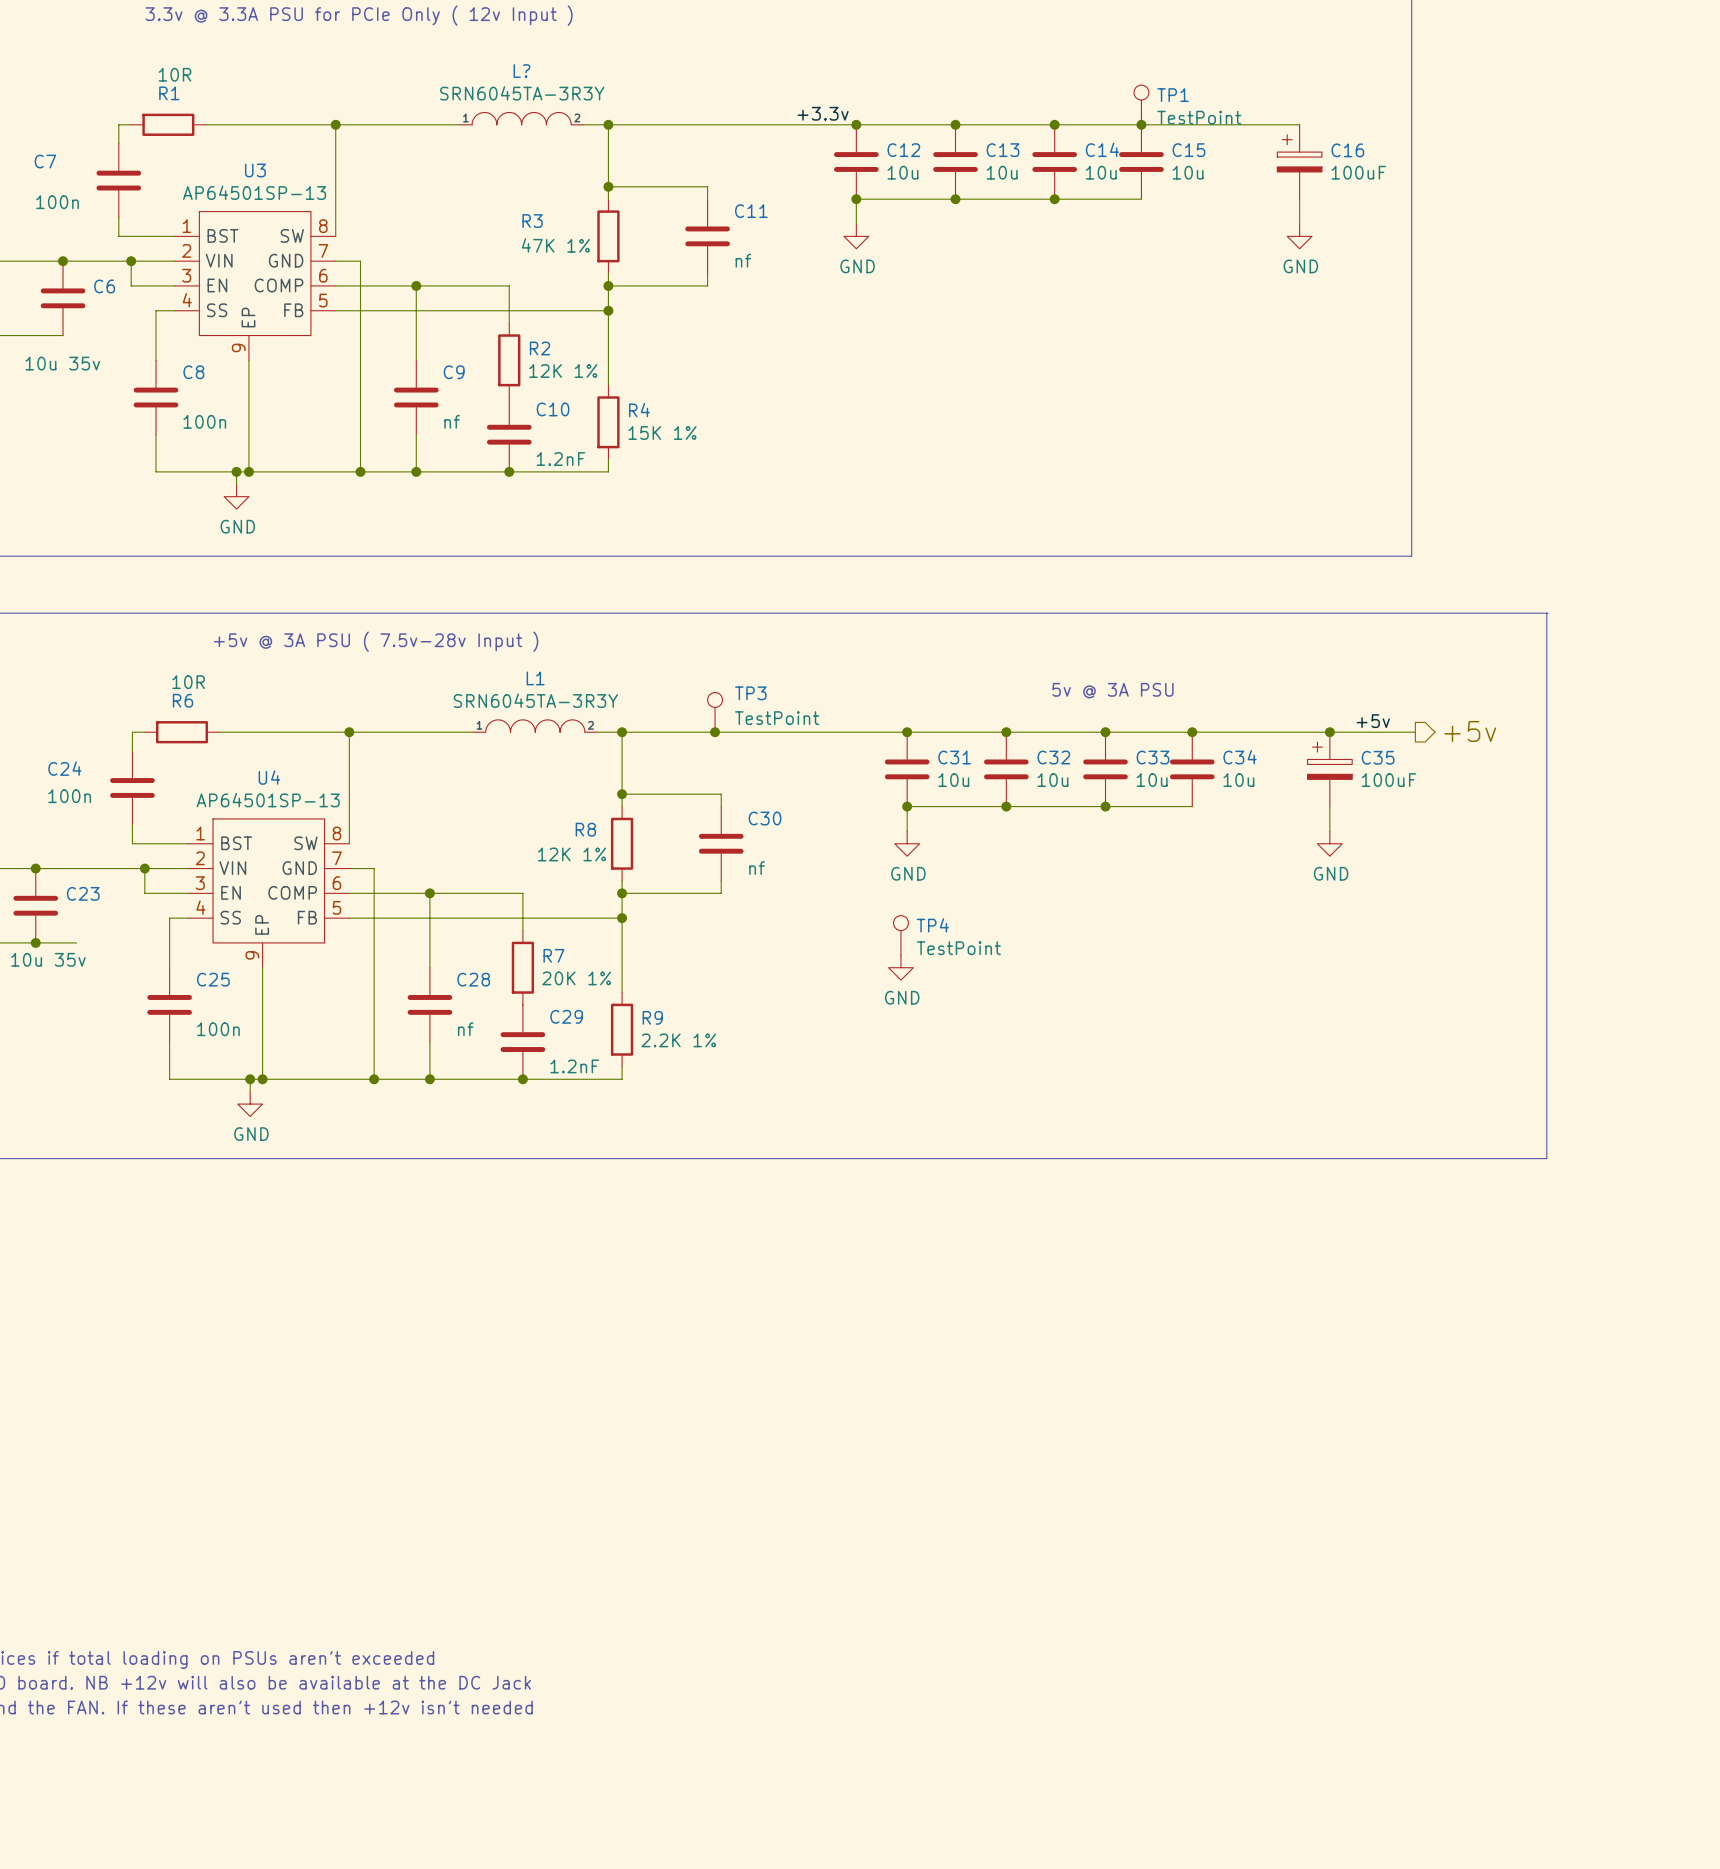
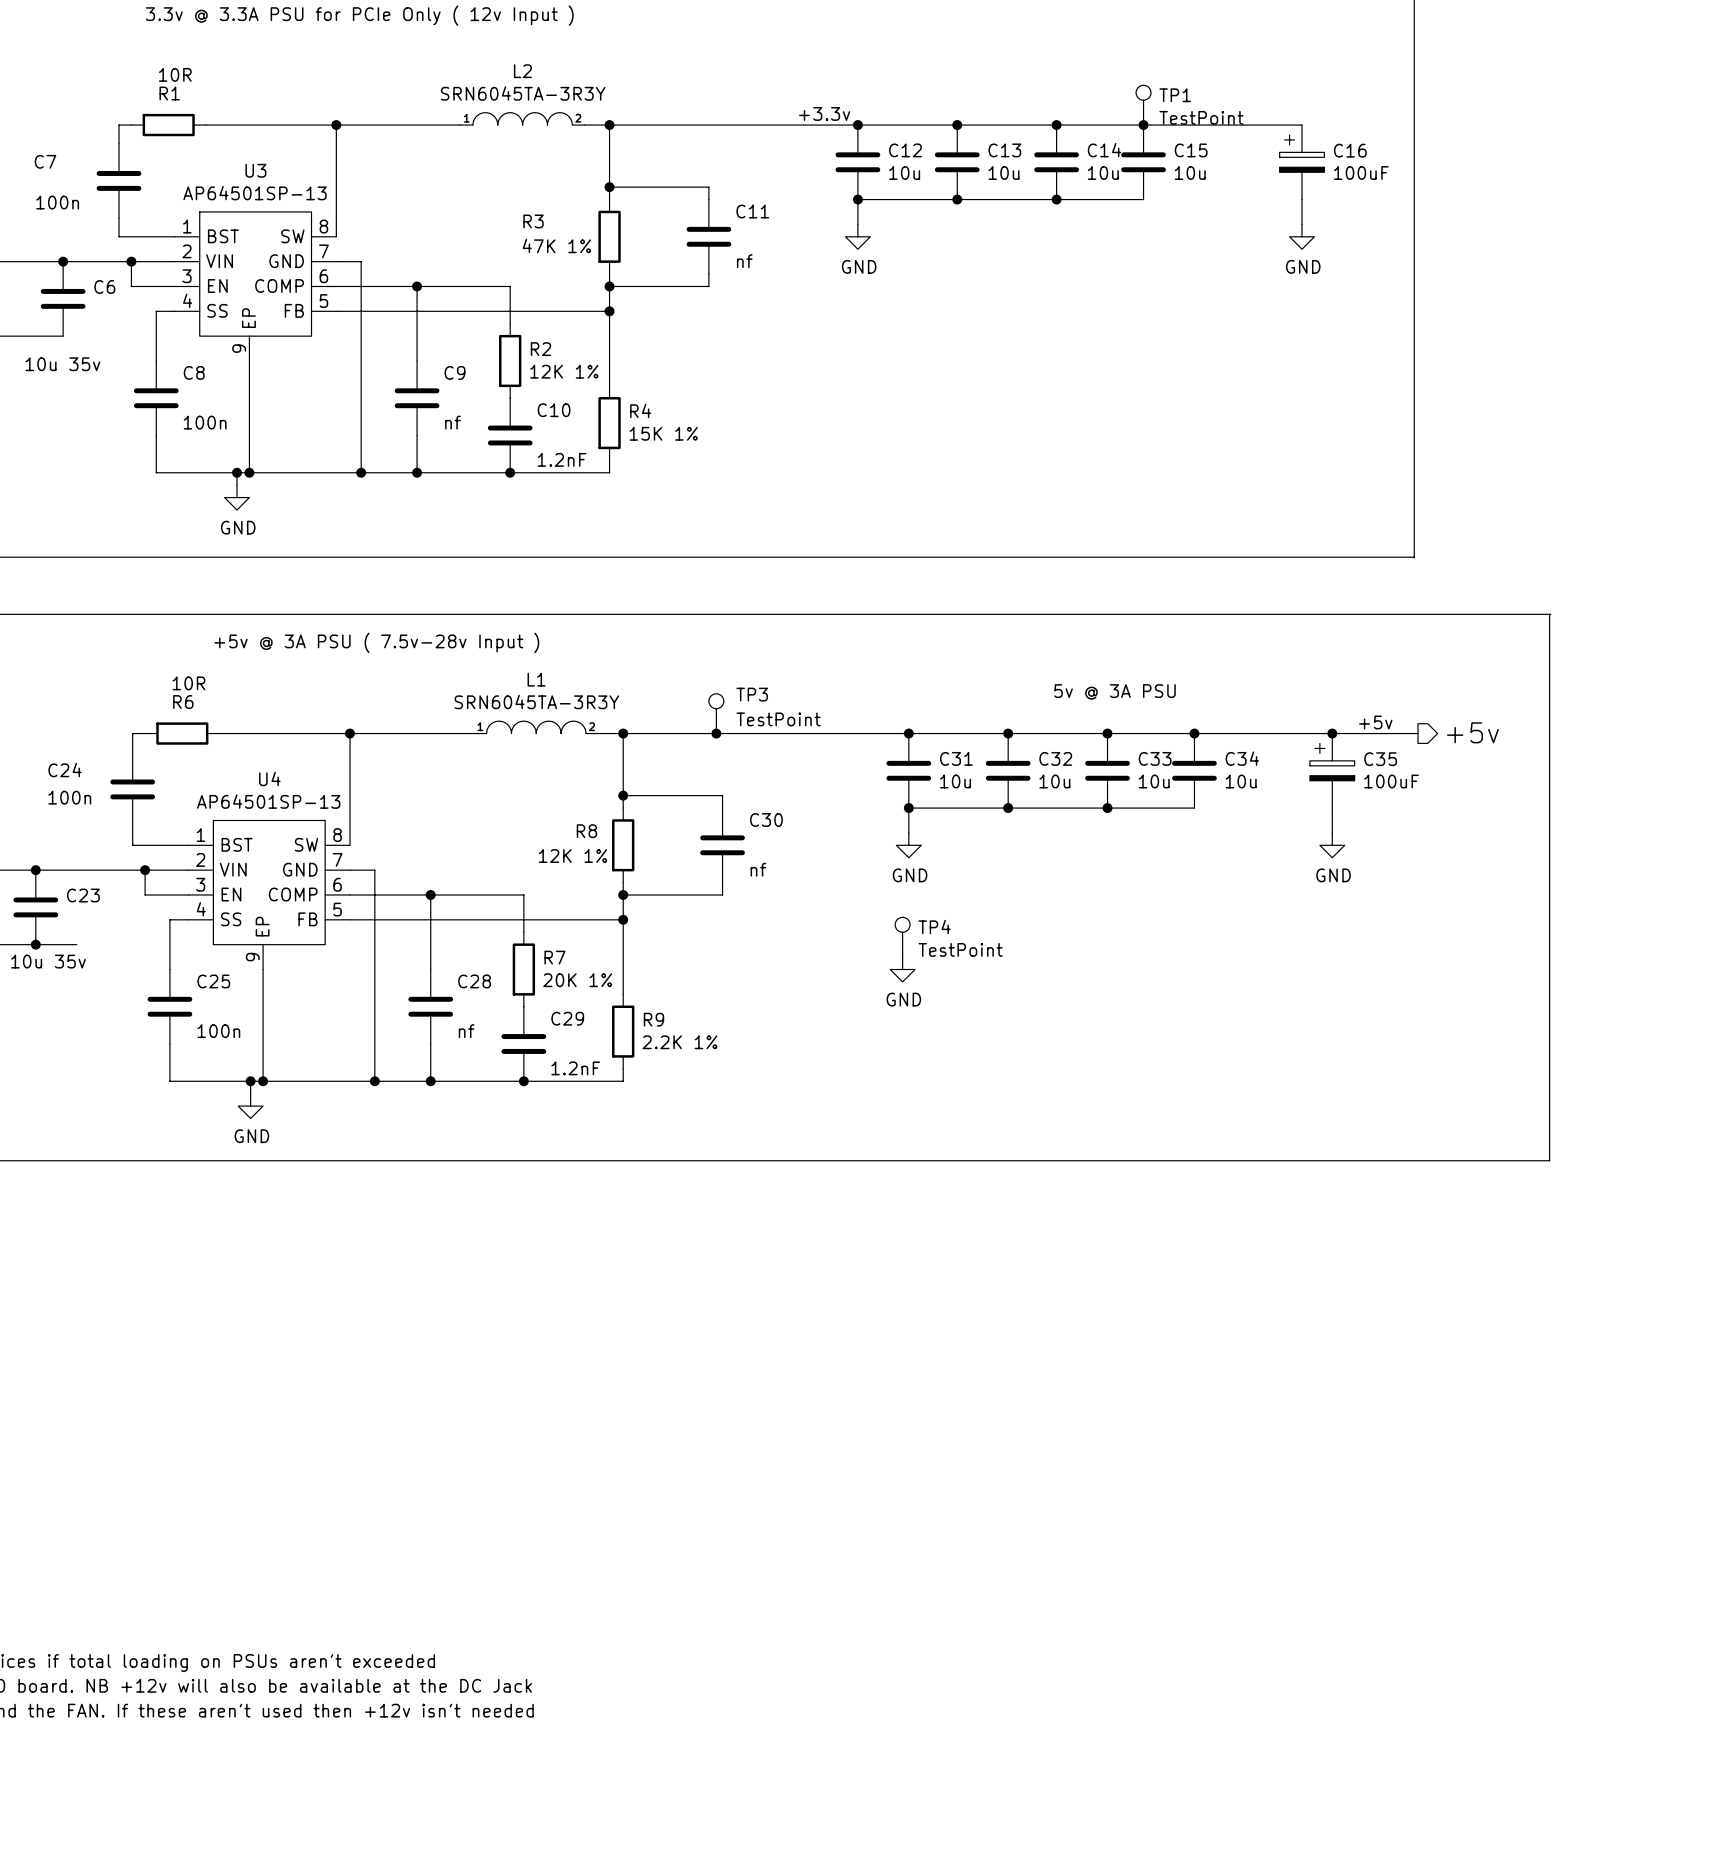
L? name: L? (521, 71) -> L2 (522, 71)

